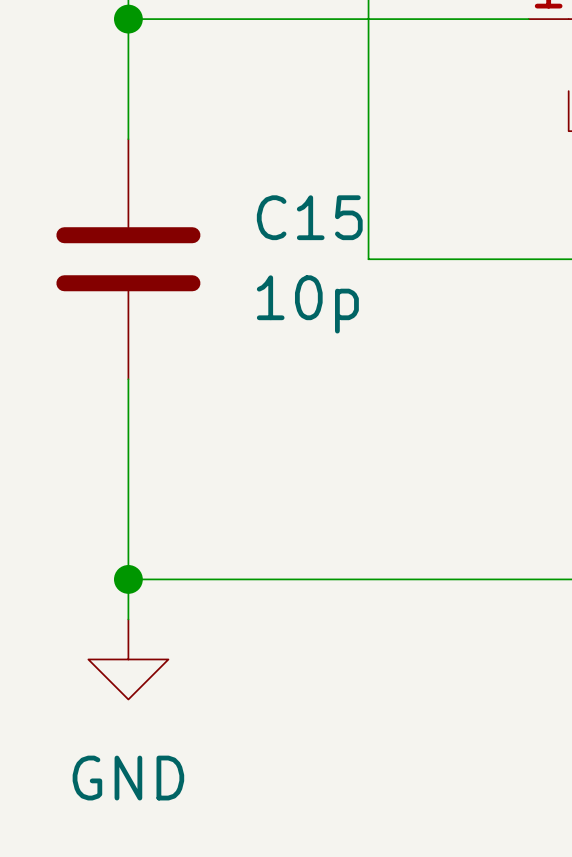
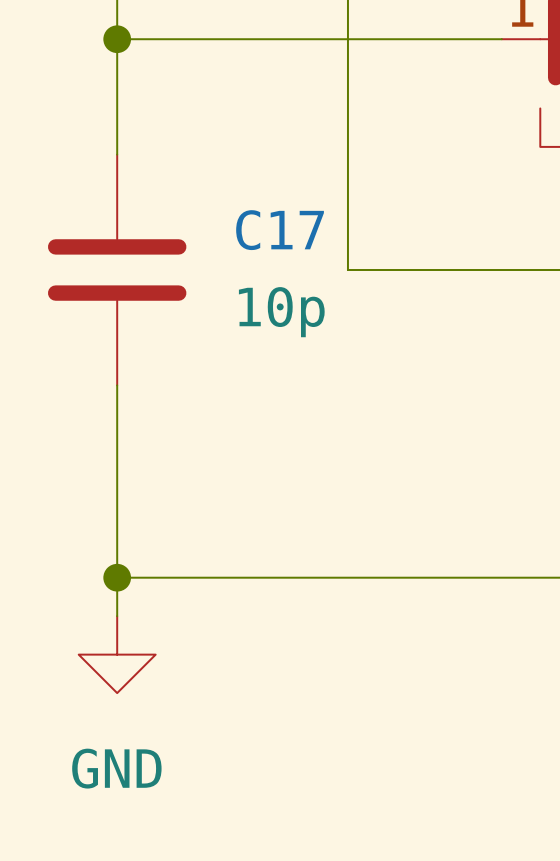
C15 name: C15 (309, 217) -> C17 (280, 230)

